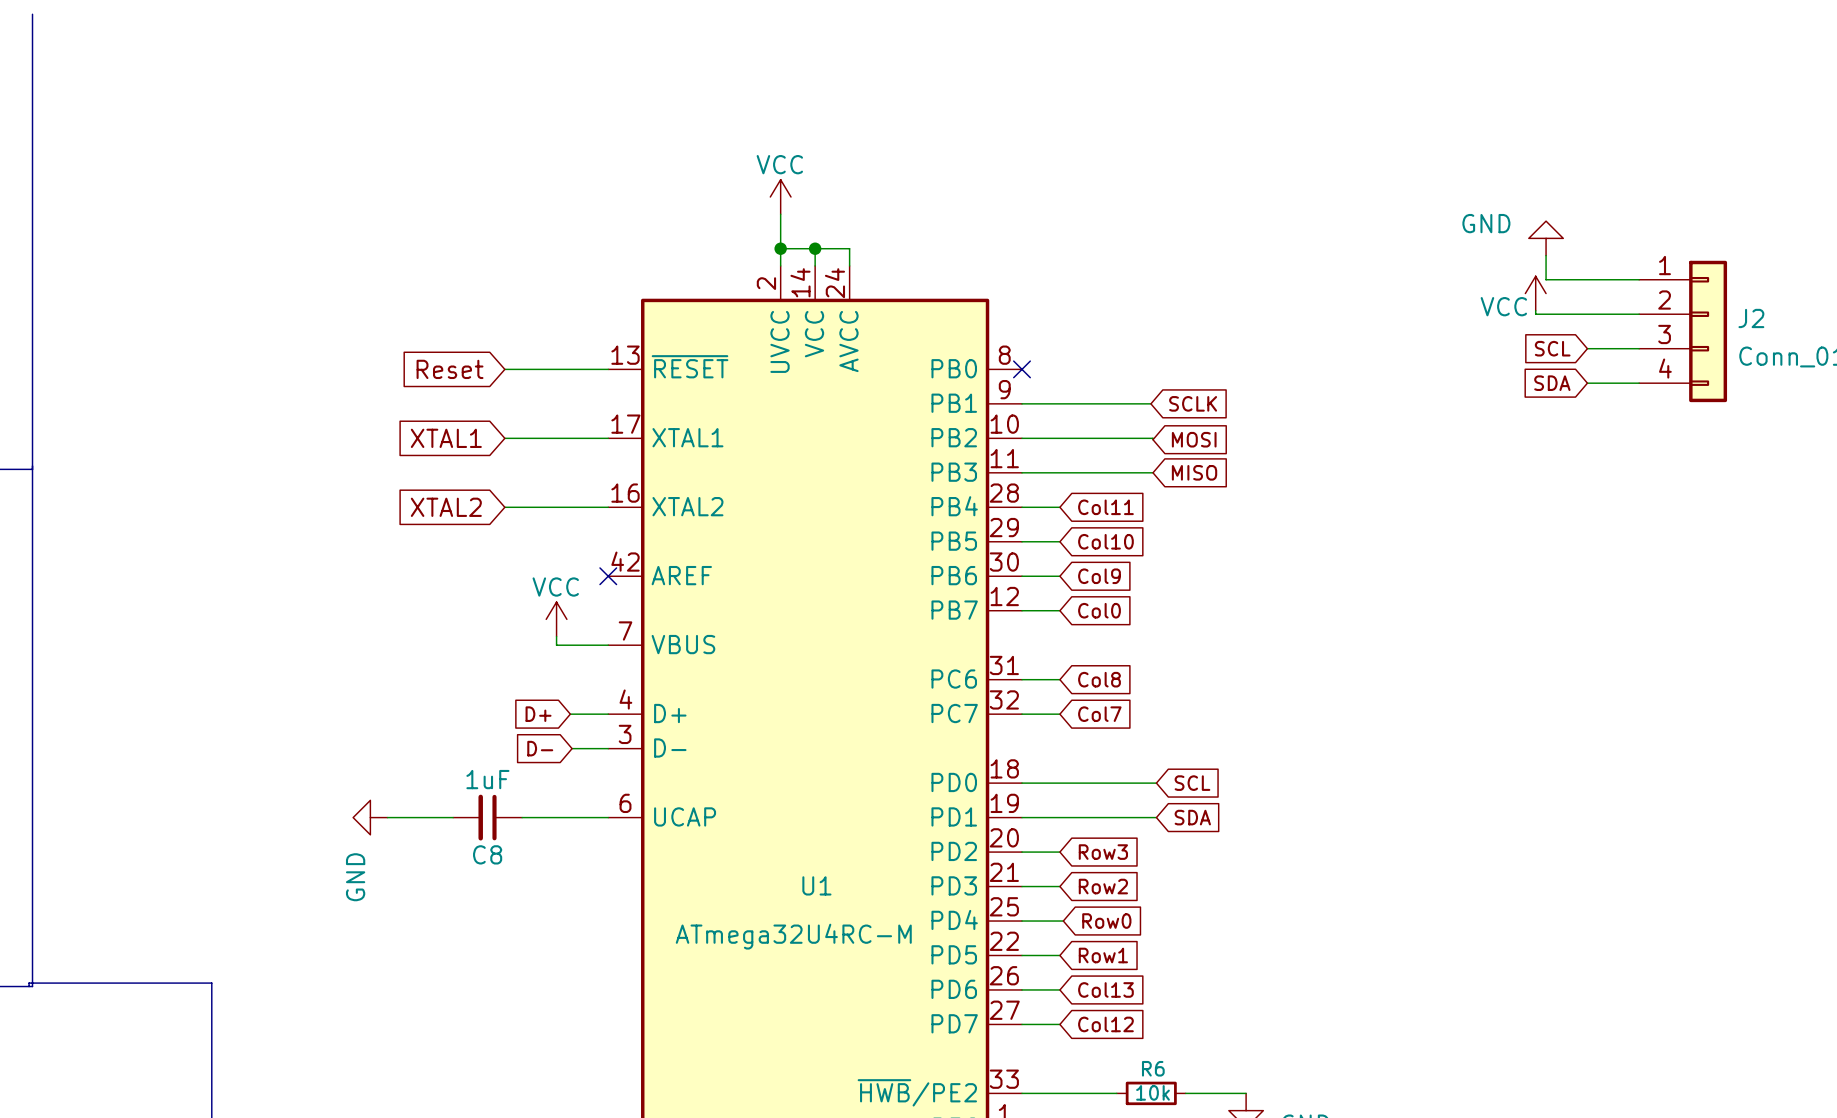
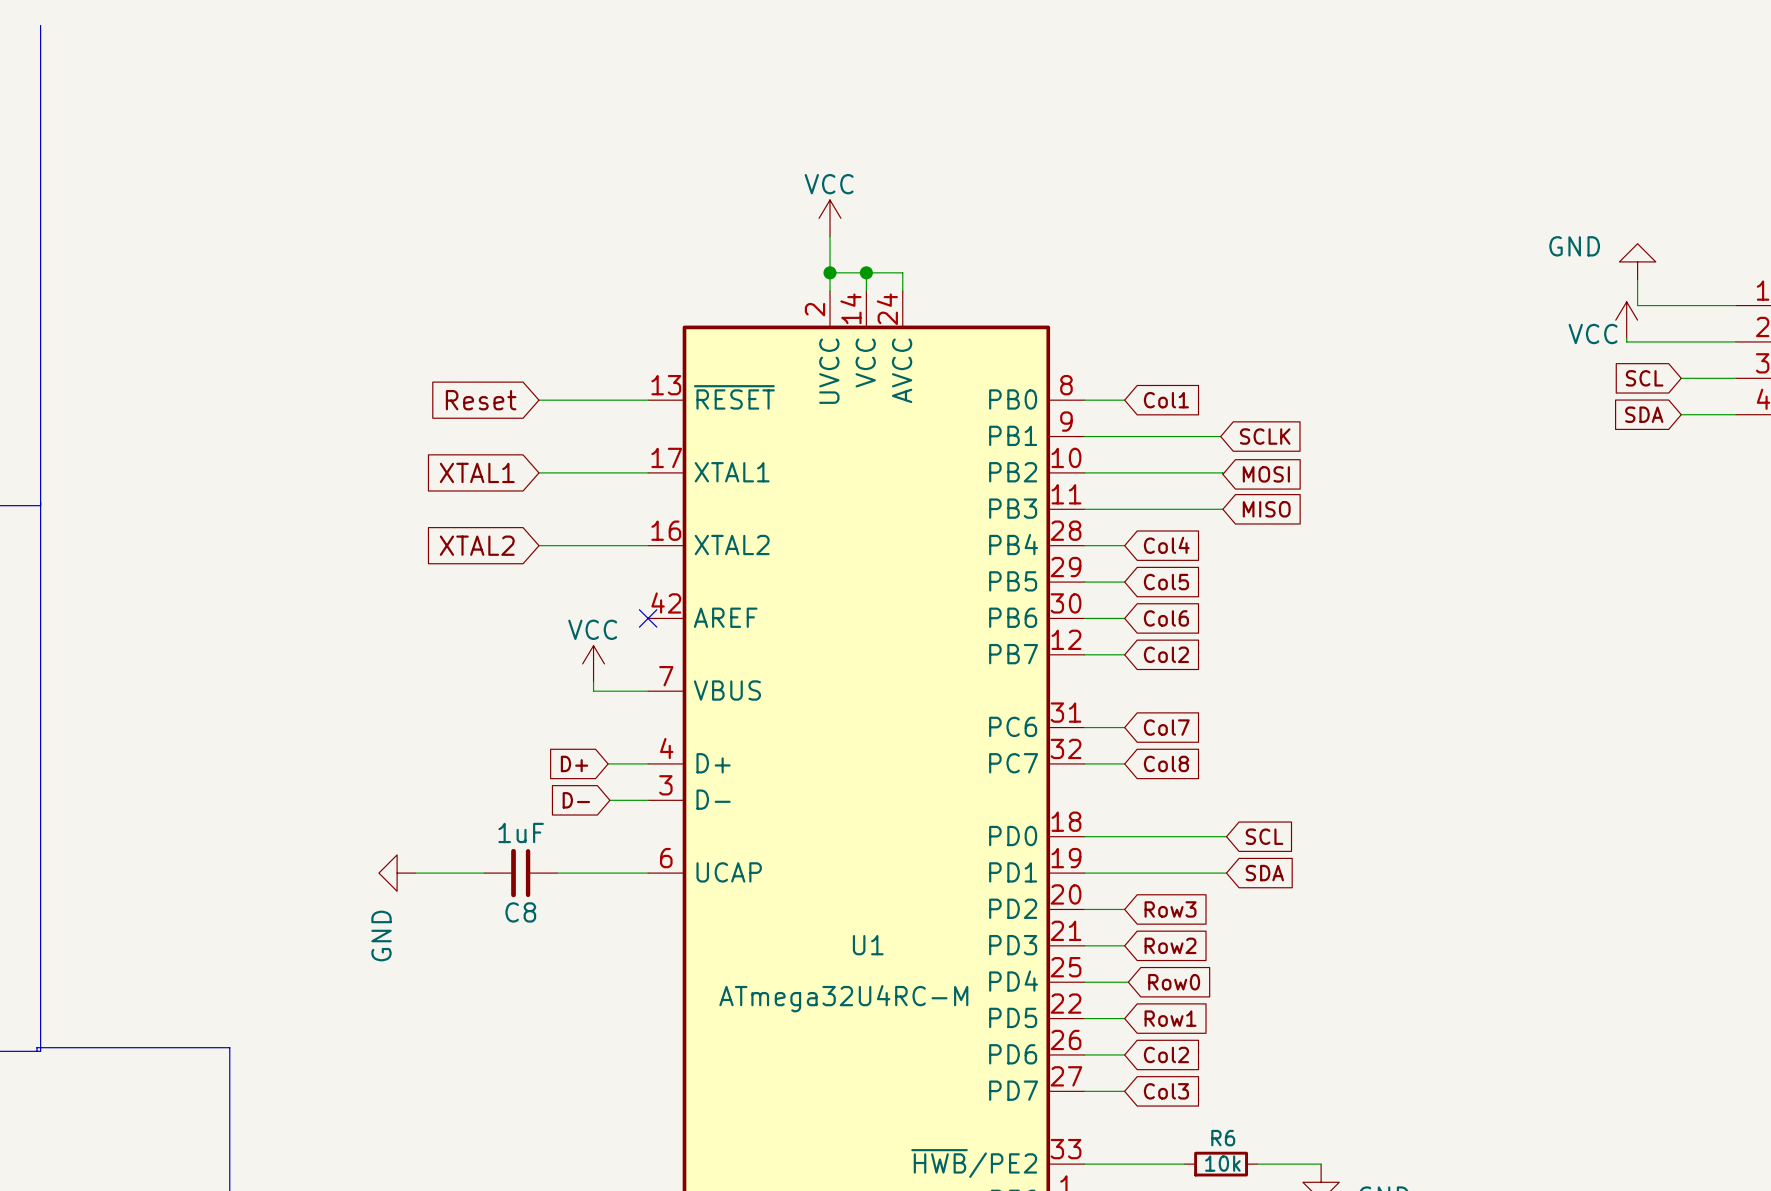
wire: none -> (1084, 400) (1124, 400)
no-connect mark: (1021, 369) -> none
global label: none -> Col1 (1166, 400)
global label: Col11 (1105, 507) -> Col4 (1166, 545)
global label: Col10 (1105, 541) -> Col5 (1166, 582)
global label: Col9 (1099, 576) -> Col6 (1166, 618)
global label: Col0 (1099, 610) -> Col2 (1166, 654)
global label: Col8 (1099, 679) -> Col7 (1166, 727)
global label: Col7 (1099, 714) -> Col8 (1166, 763)
global label: Col13 (1105, 989) -> Col2 (1166, 1054)
global label: Col12 (1105, 1024) -> Col3 (1166, 1091)

